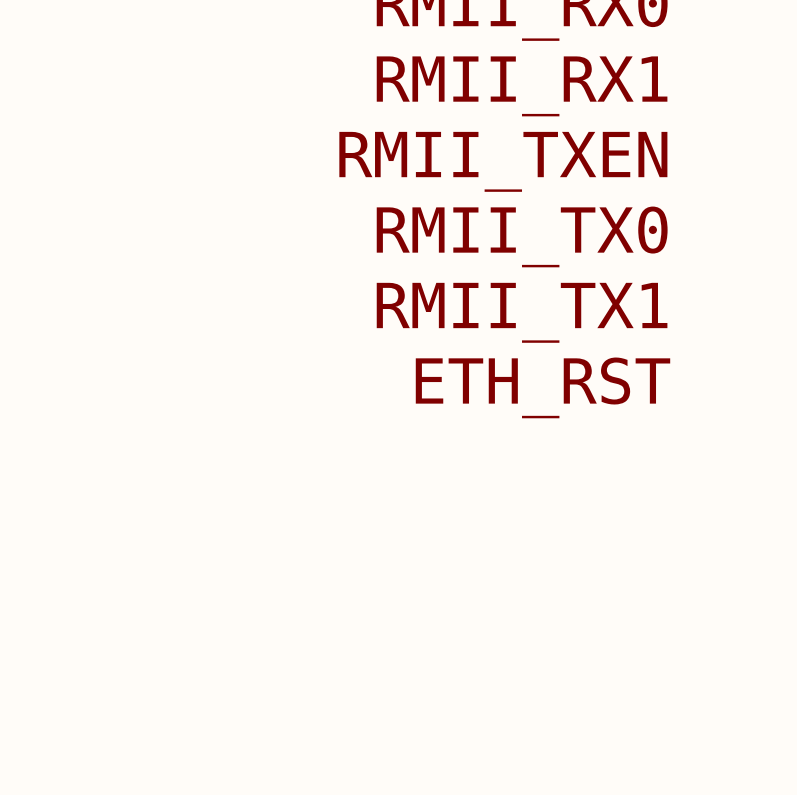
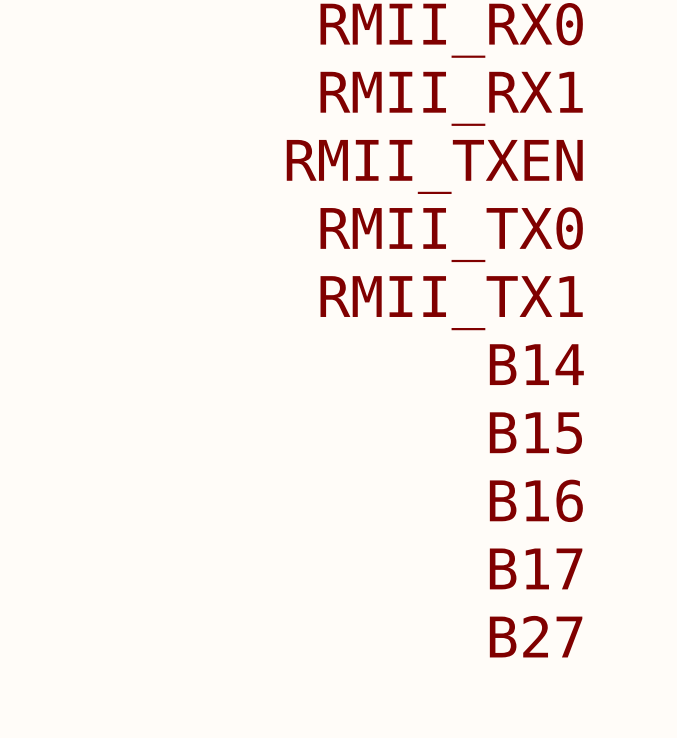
label: ETH_RST (542, 387) -> B14 (536, 364)
label: none -> B15 (535, 433)
label: none -> B16 (536, 500)
label: none -> B17 (536, 568)
label: none -> B27 (536, 636)

